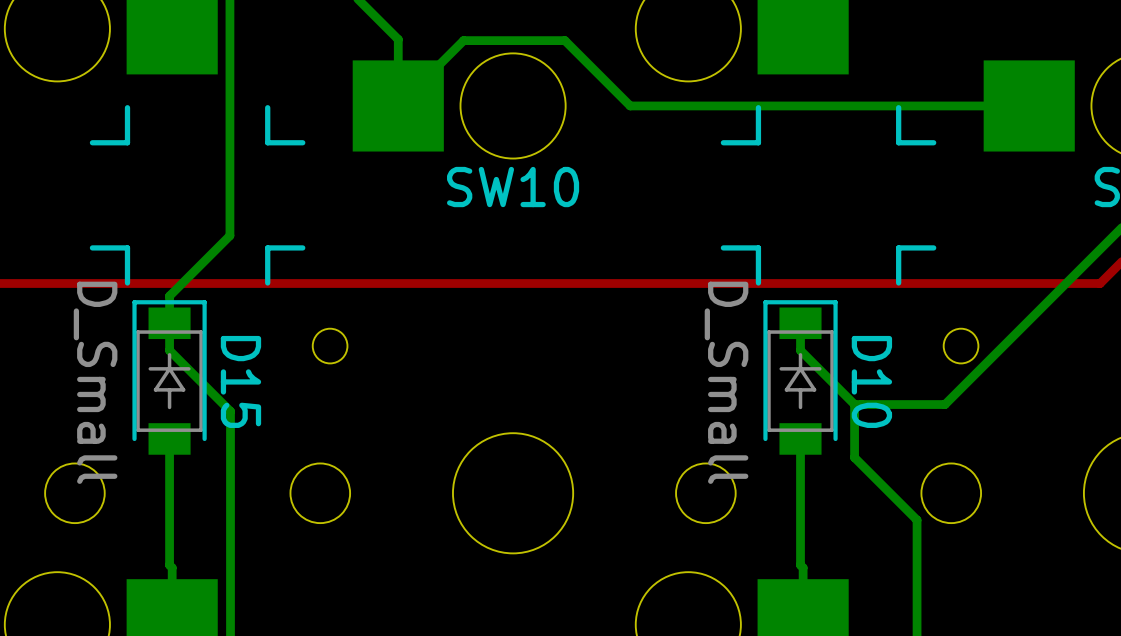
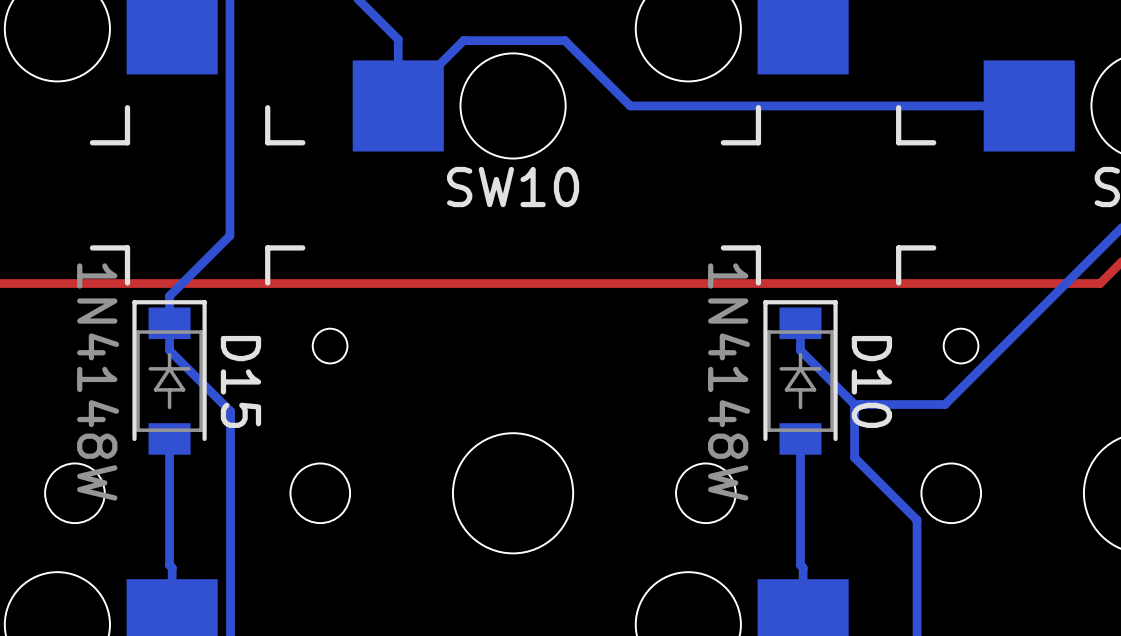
D15 value: D_Small (95, 382) -> 1N4148W (98, 381)
D10 value: D_Small (726, 382) -> 1N4148W (729, 381)

